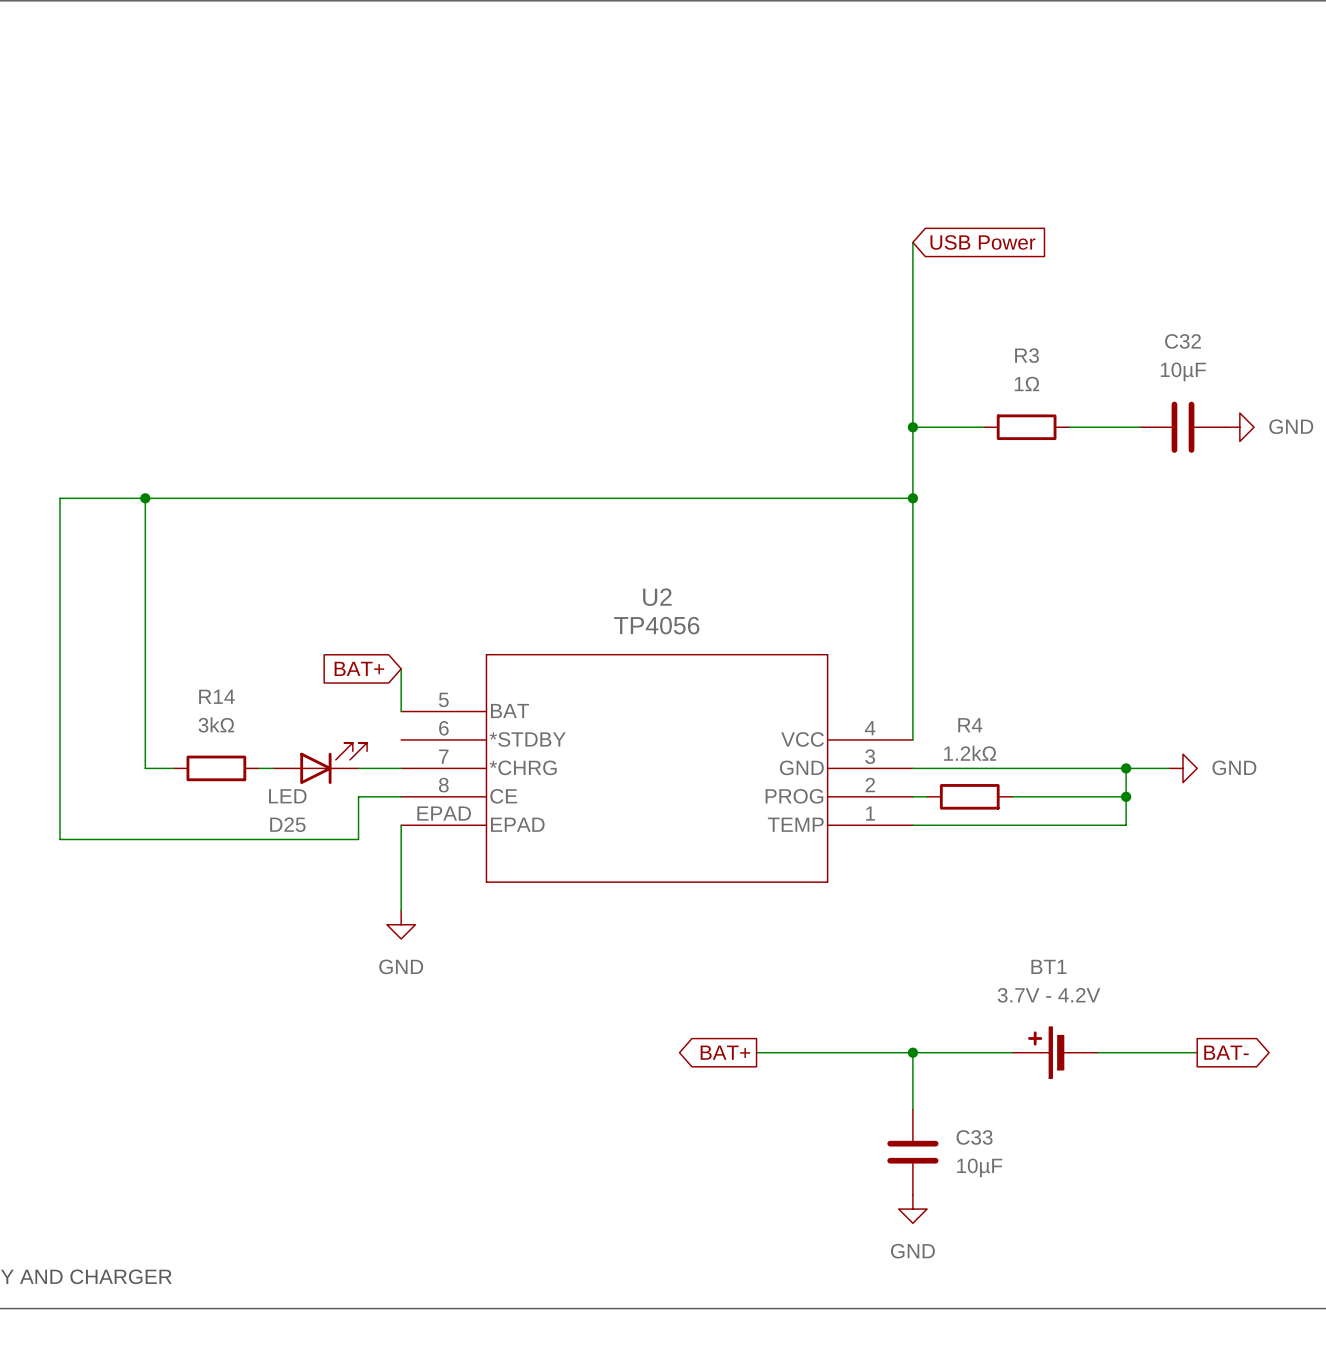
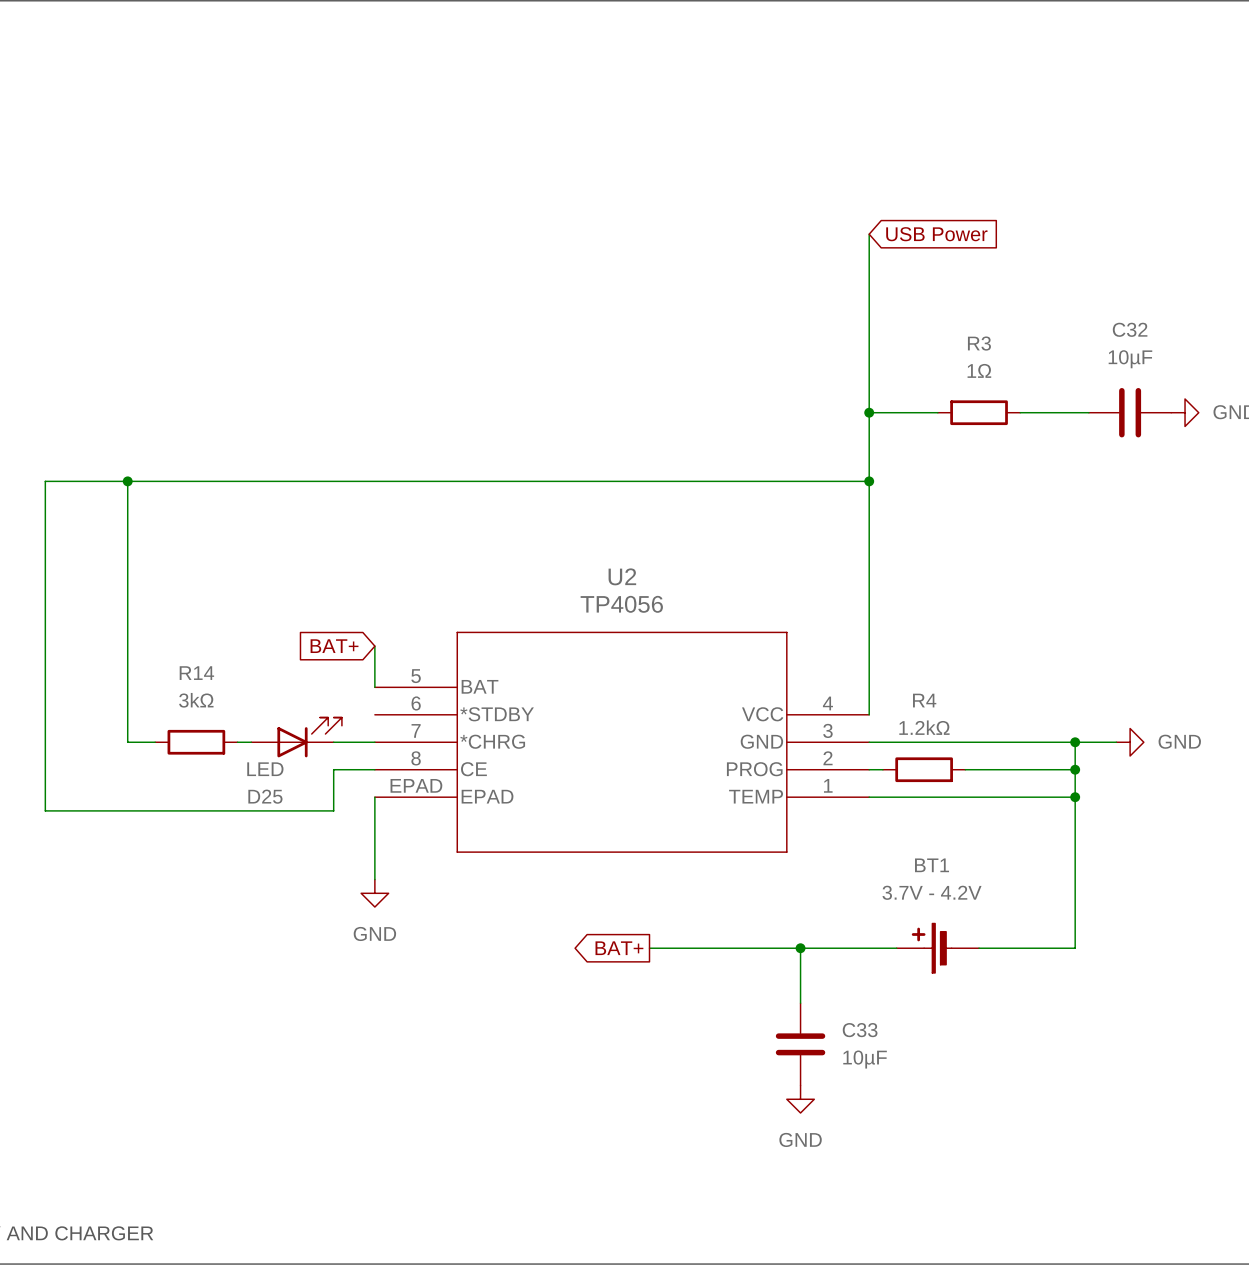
wire: none -> (1075, 797) (1075, 948) (979, 948)
junction: none -> (1075, 797)
junction: none -> (800, 948)
global label position: BAT+ (725, 1052) -> BAT+ (619, 948)
wire: (756, 1052) (1012, 1052) -> (649, 948) (896, 948)
wire: (912, 1052) (912, 1109) -> (800, 948) (800, 1003)
junction: (912, 1052) -> none
BT1 position: (1055, 1052) -> (937, 948)
wire: (1097, 1052) (1197, 1052) -> none
global label: BAT- (1226, 1052) -> none
C33 position: (912, 1152) -> (800, 1044)
power symbol position: GND (912, 1209) -> GND (800, 1099)

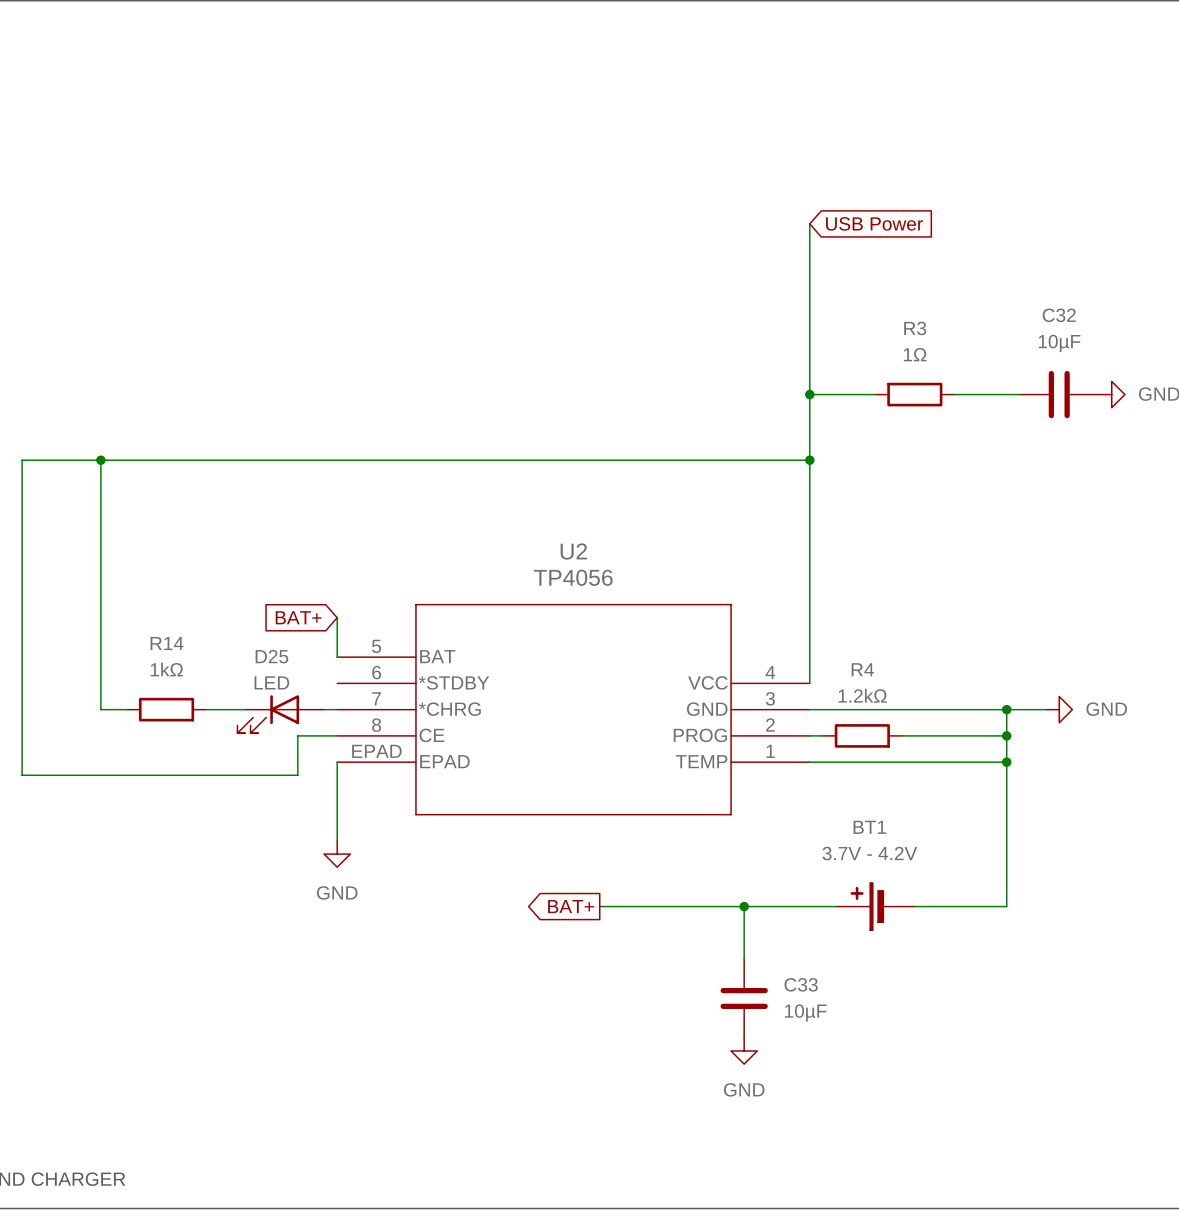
R14 value: 3kΩ (196, 700) -> 1kΩ (166, 669)
D25 rotation: 0° (309, 737) -> 180° (268, 714)
D25 value position: LED (265, 769) -> LED (271, 682)
D25 name position: D25 (265, 796) -> D25 (271, 656)

